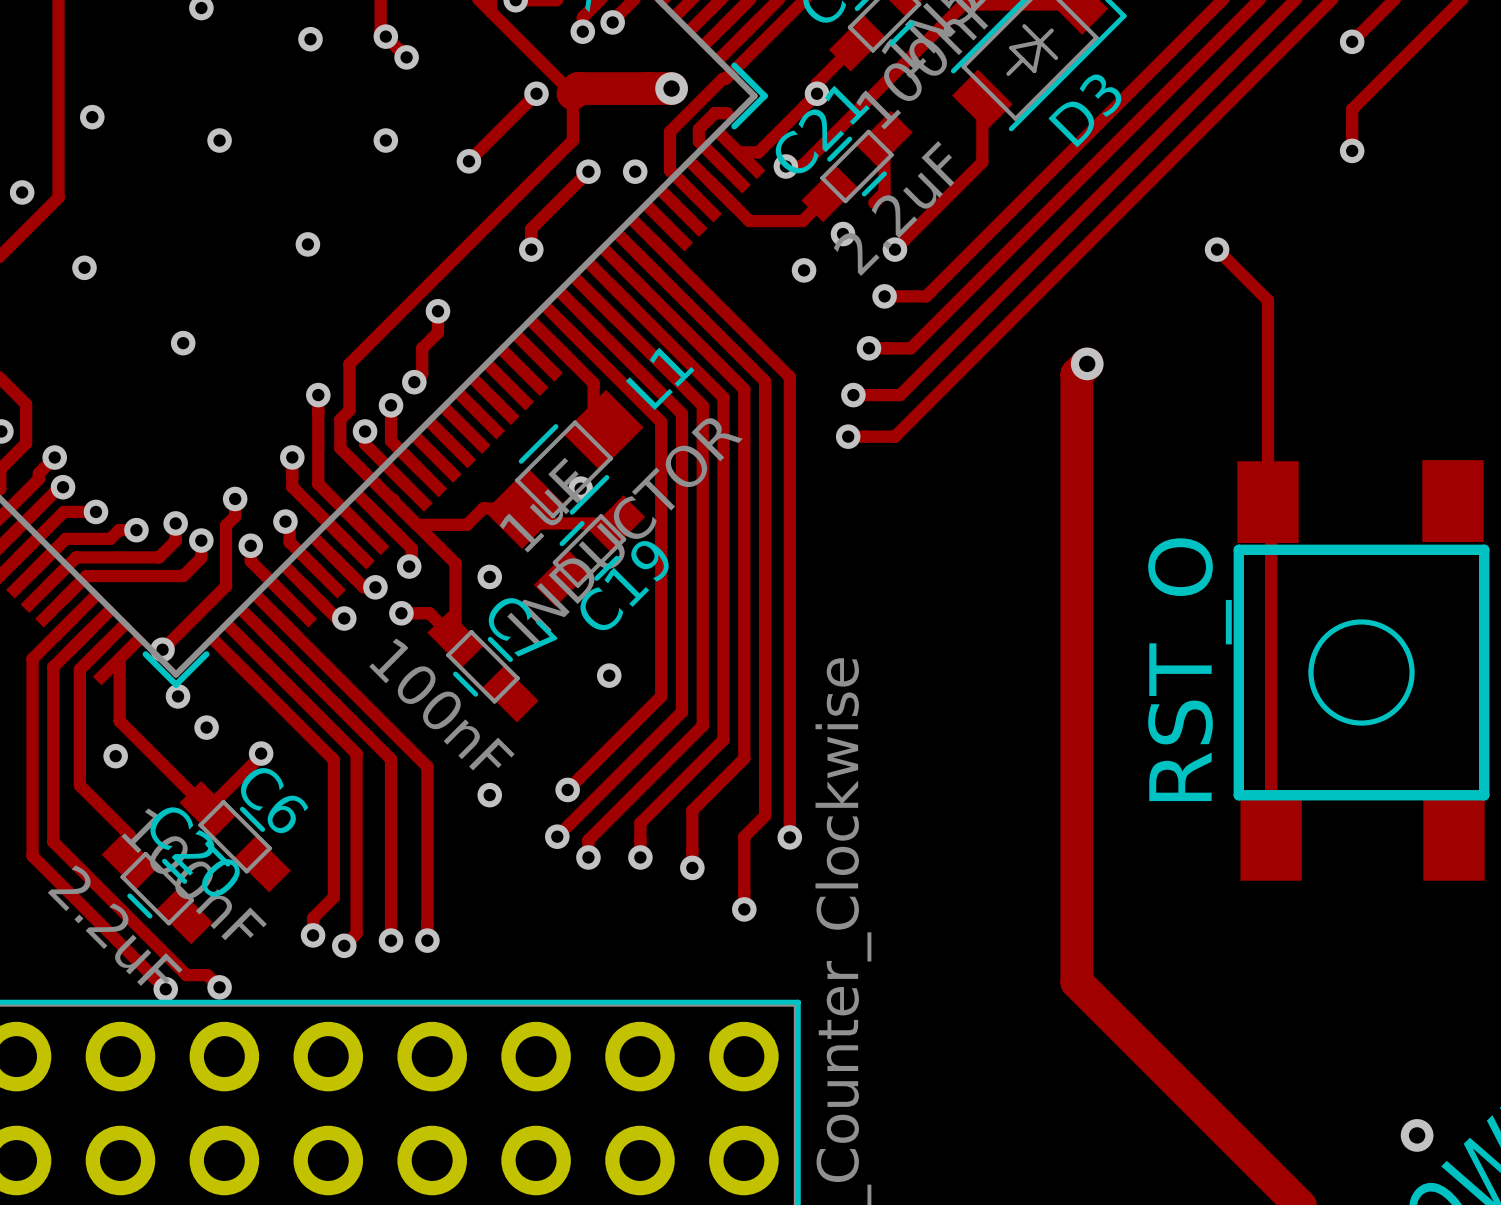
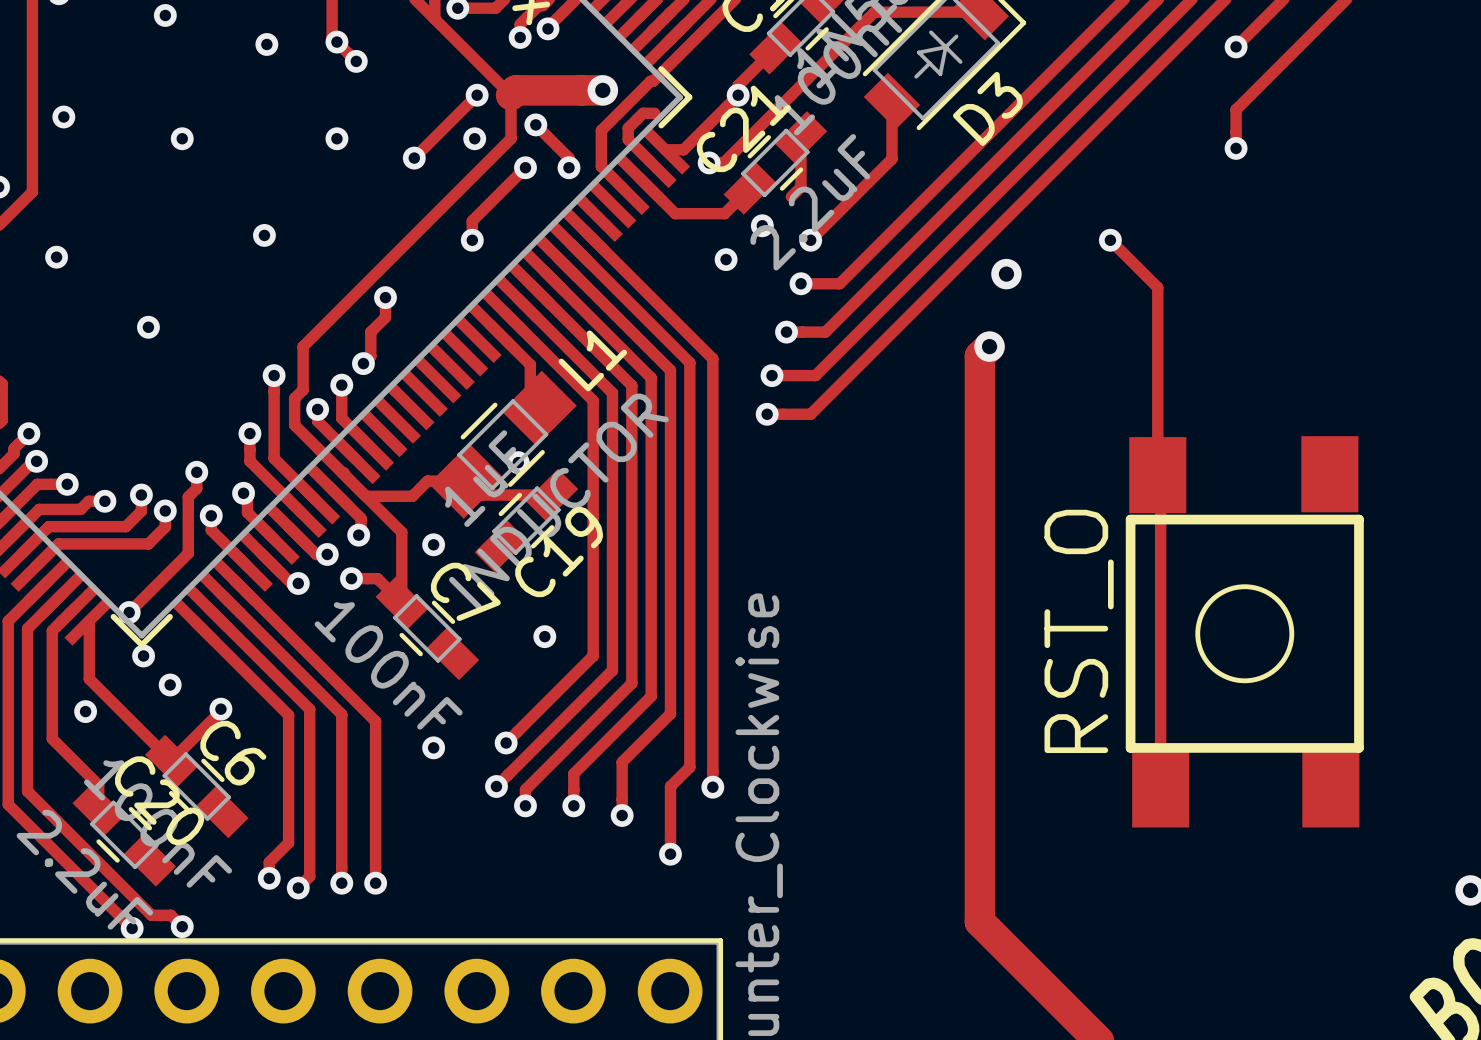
track: none -> (535, 124) (568, 158) (568, 167)
via: none -> (535, 124)
via: none -> (474, 138)
via: none -> (1006, 274)

